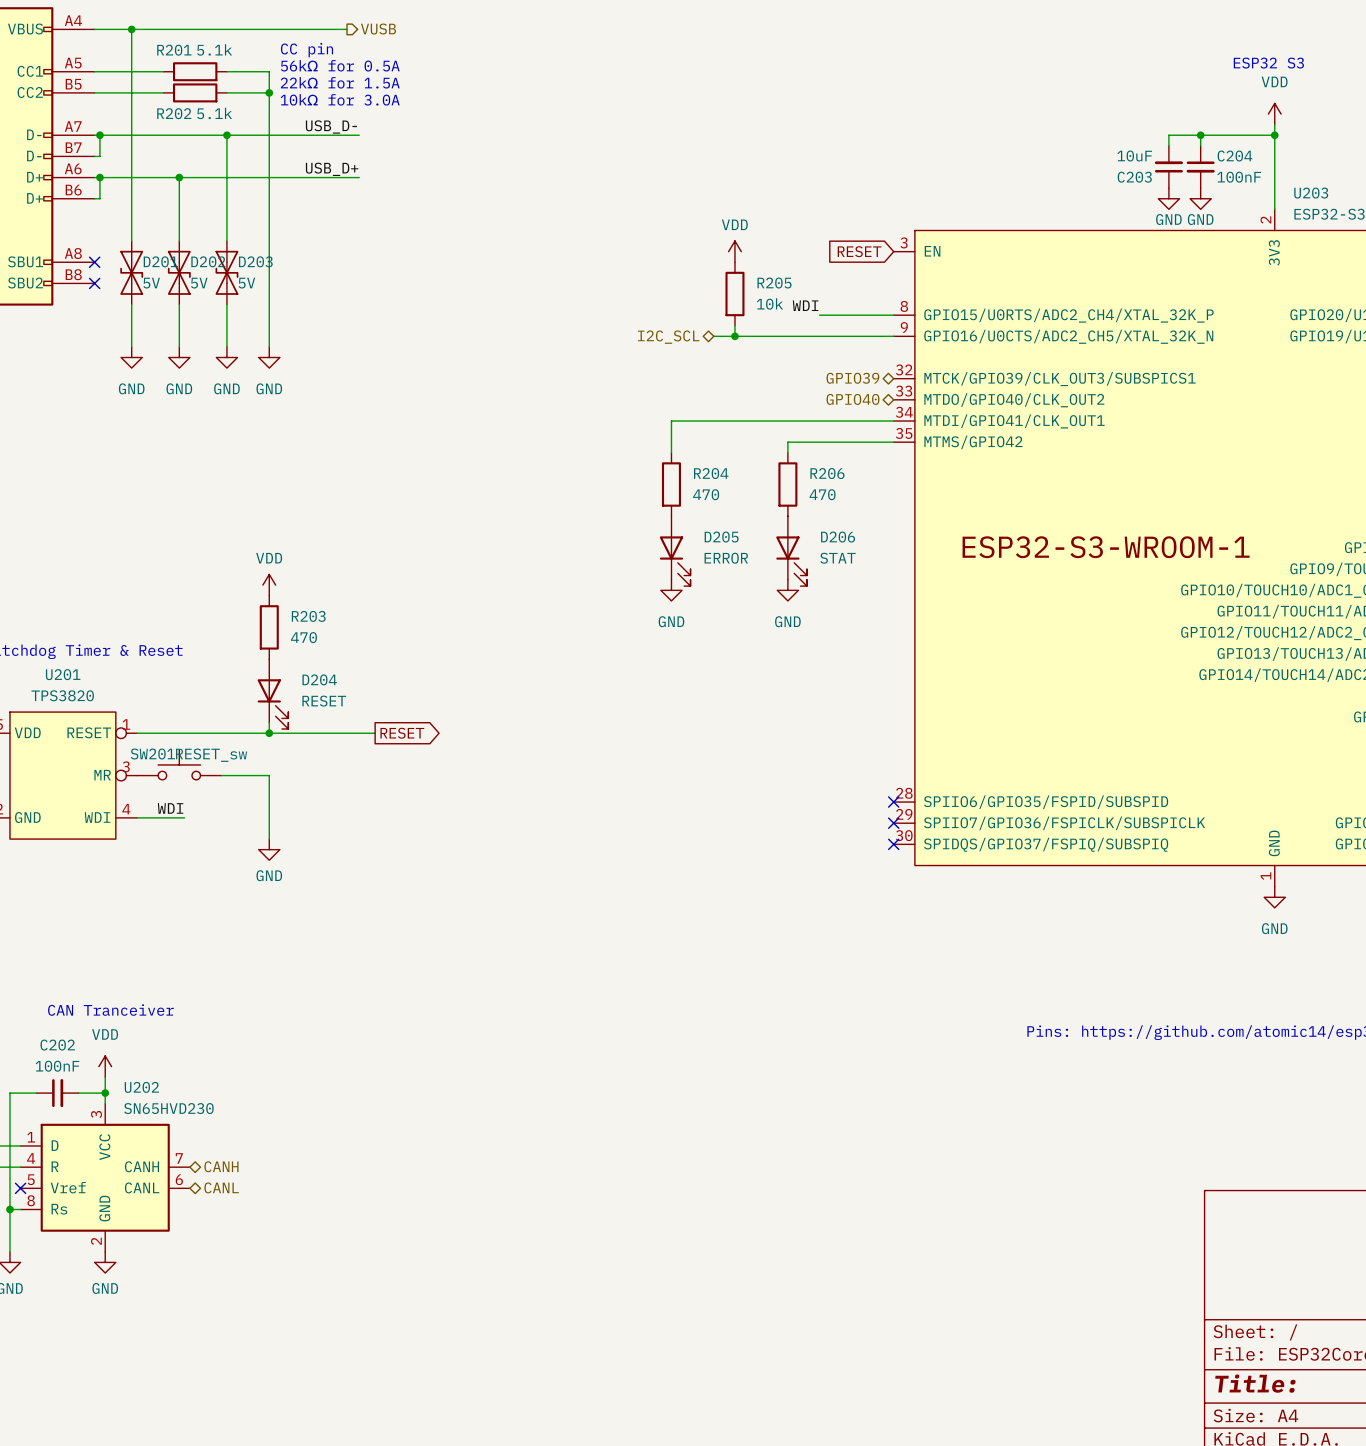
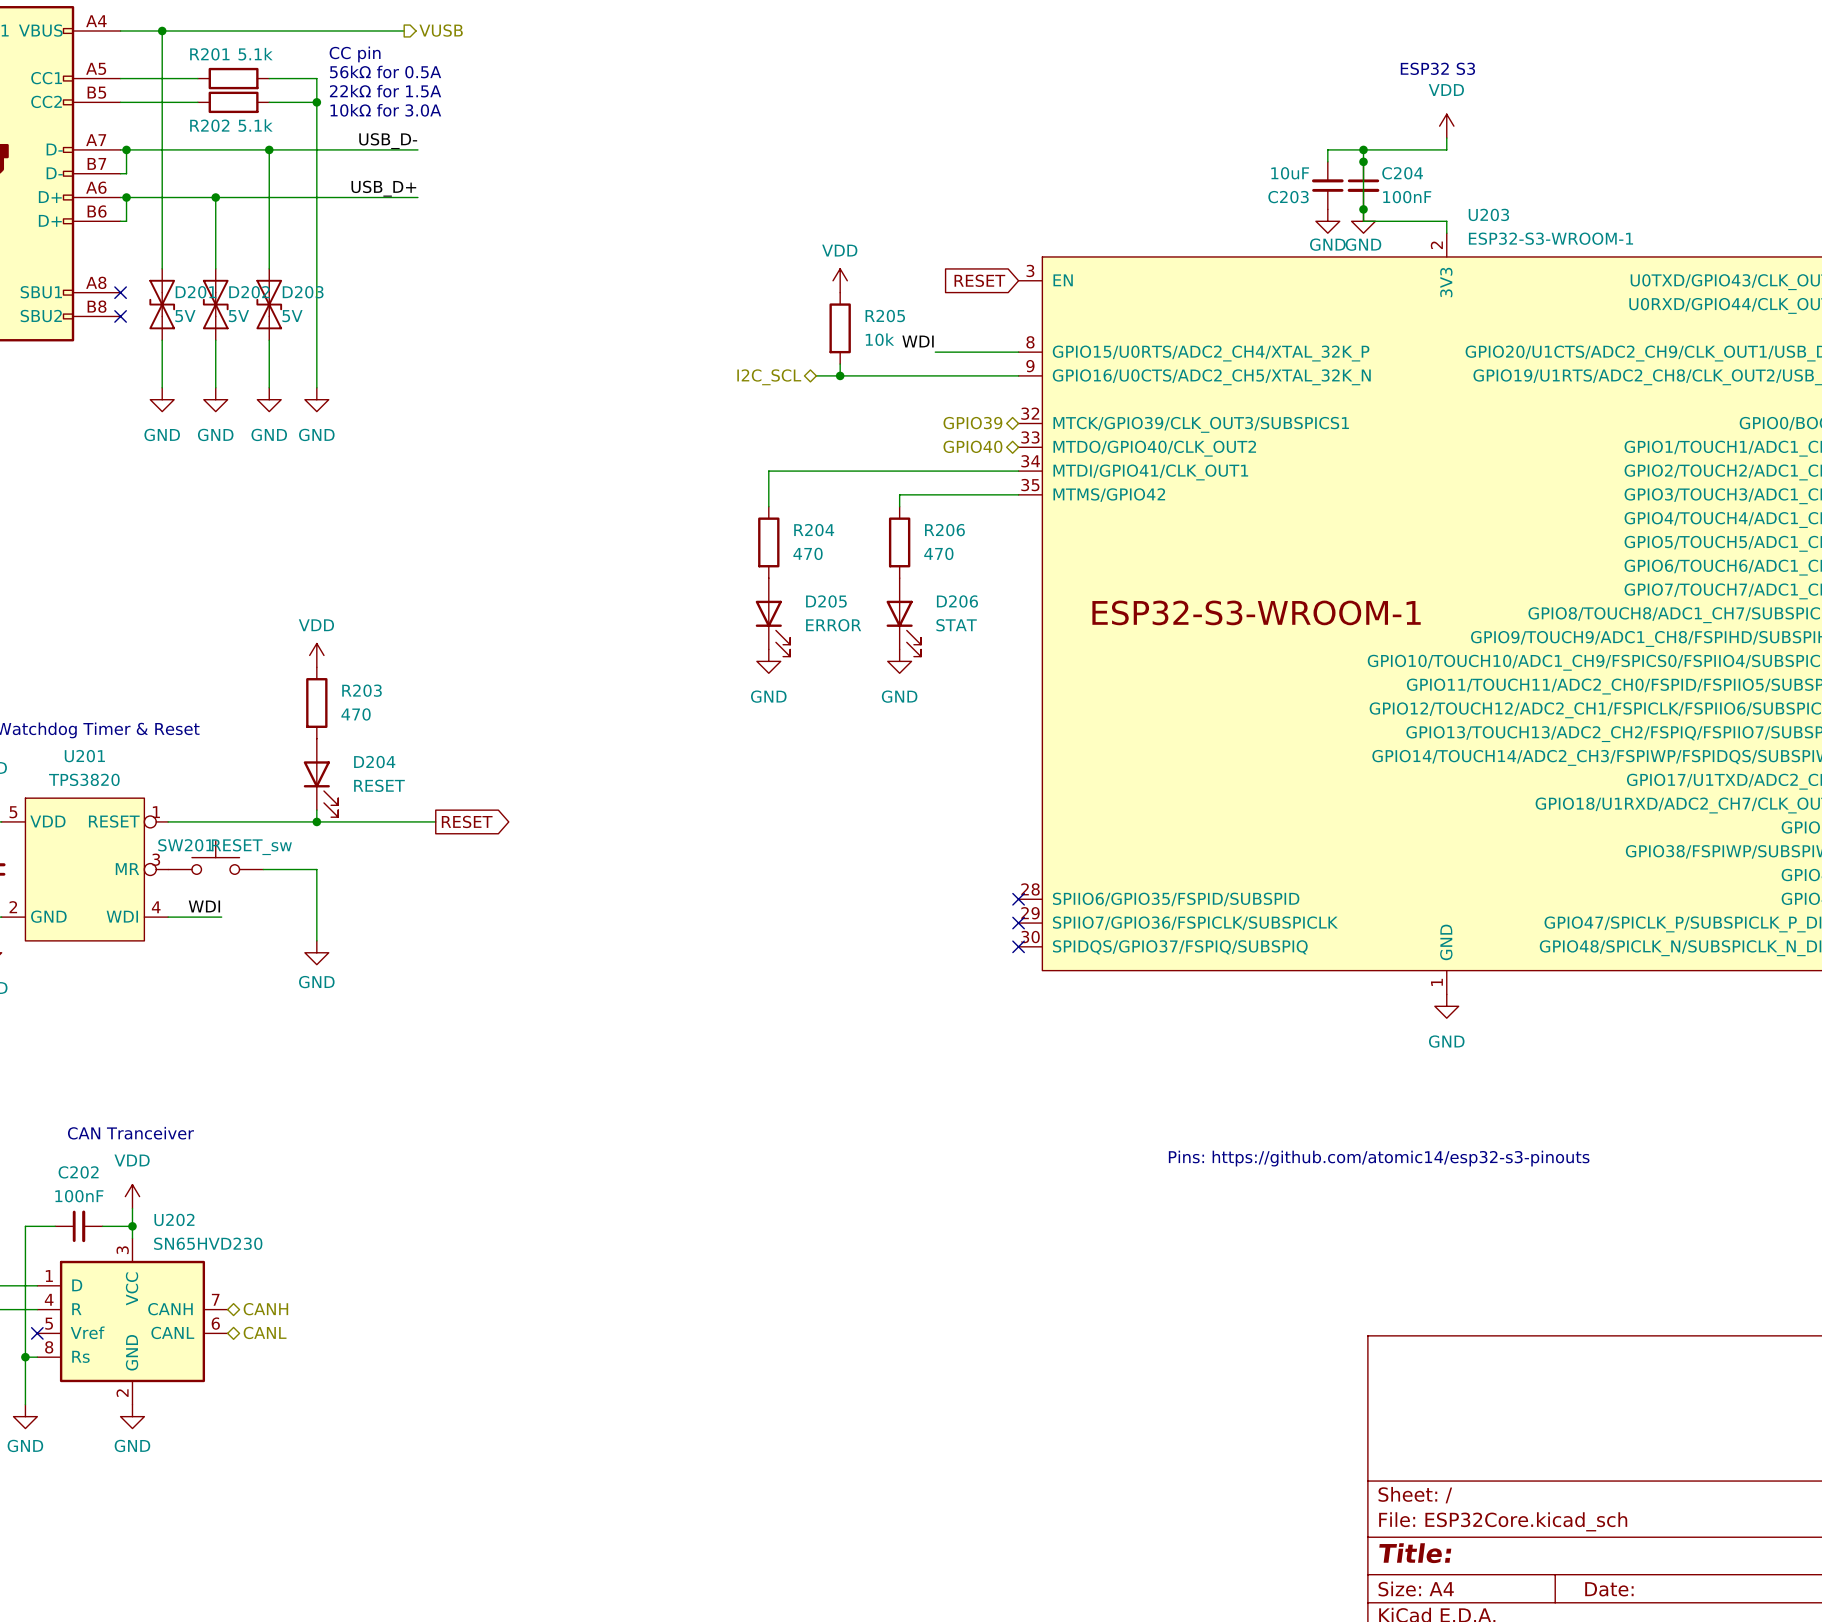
wire: (1274, 135) (1274, 198) -> (1363, 161) (1363, 221) (1446, 221)
junction: (1274, 135) -> none
junction: none -> (1363, 161)
junction: none -> (1363, 209)

